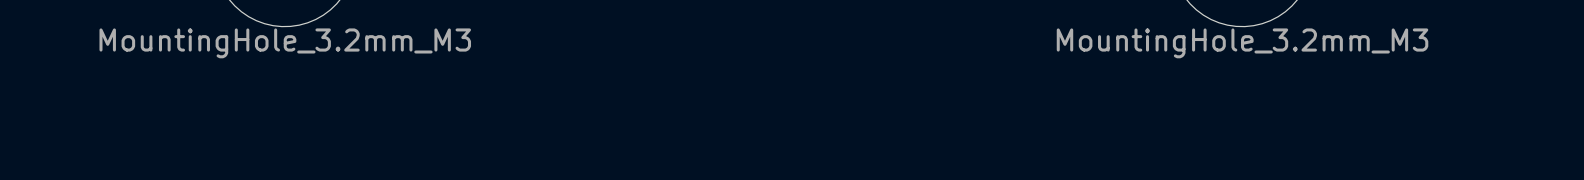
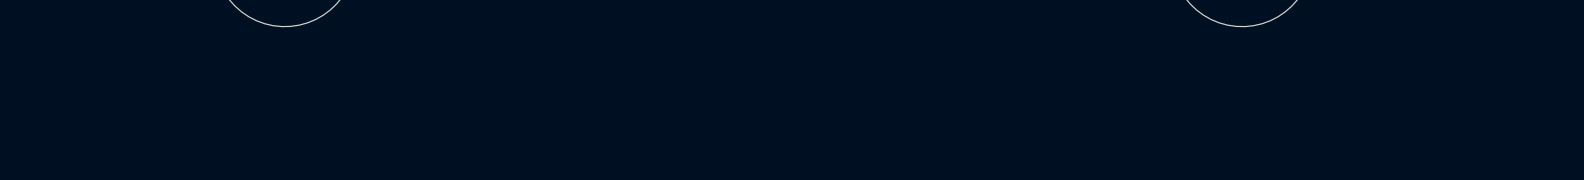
part value: MountingHole_3.2mm_M3 (285, 43) -> none
part value: MountingHole_3.2mm_M3 (1242, 43) -> none

